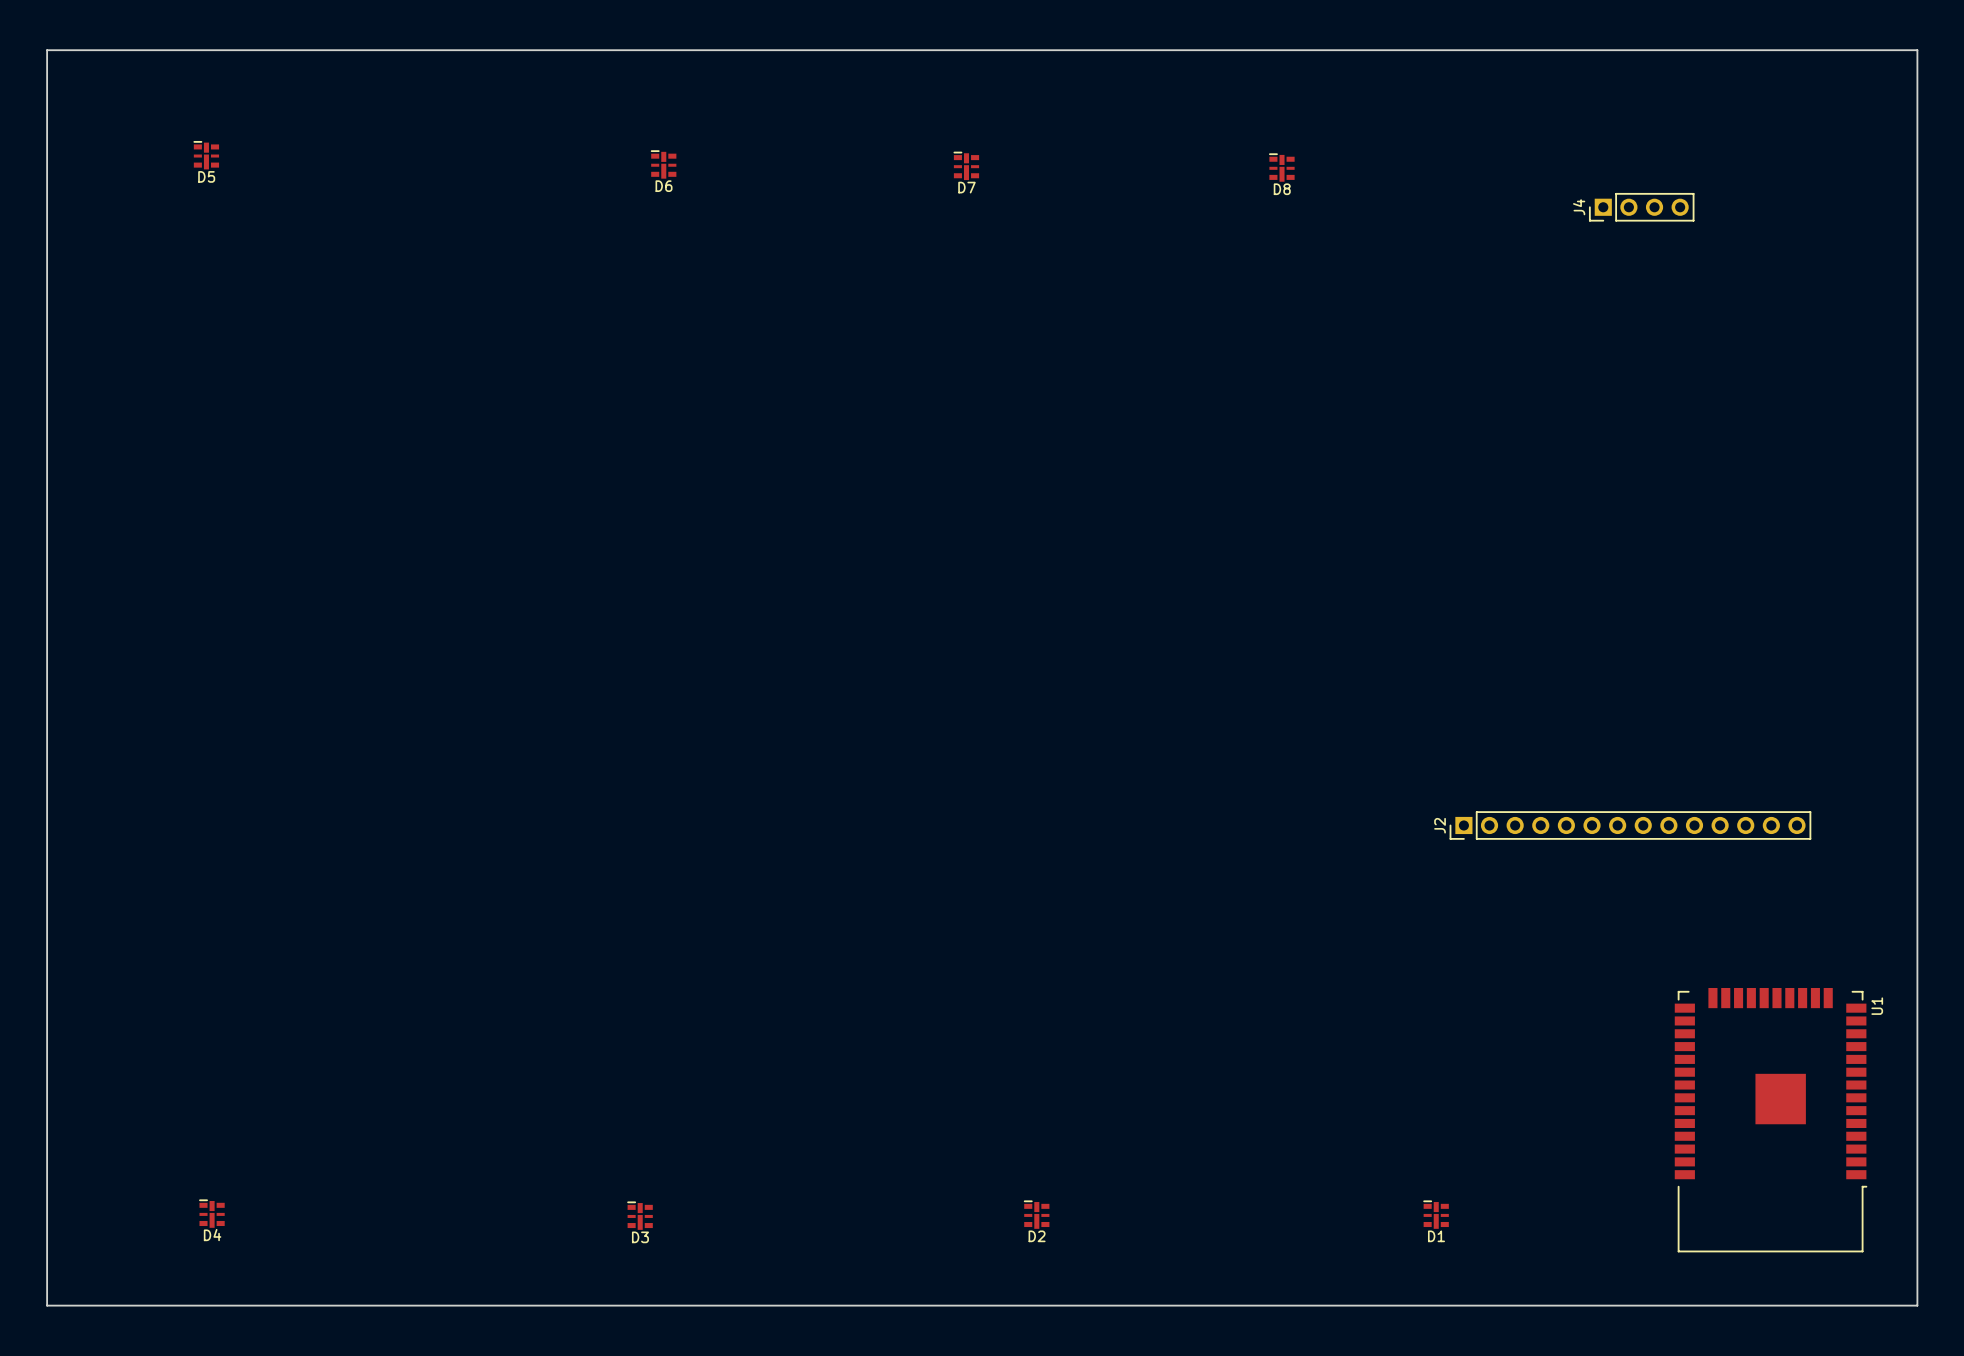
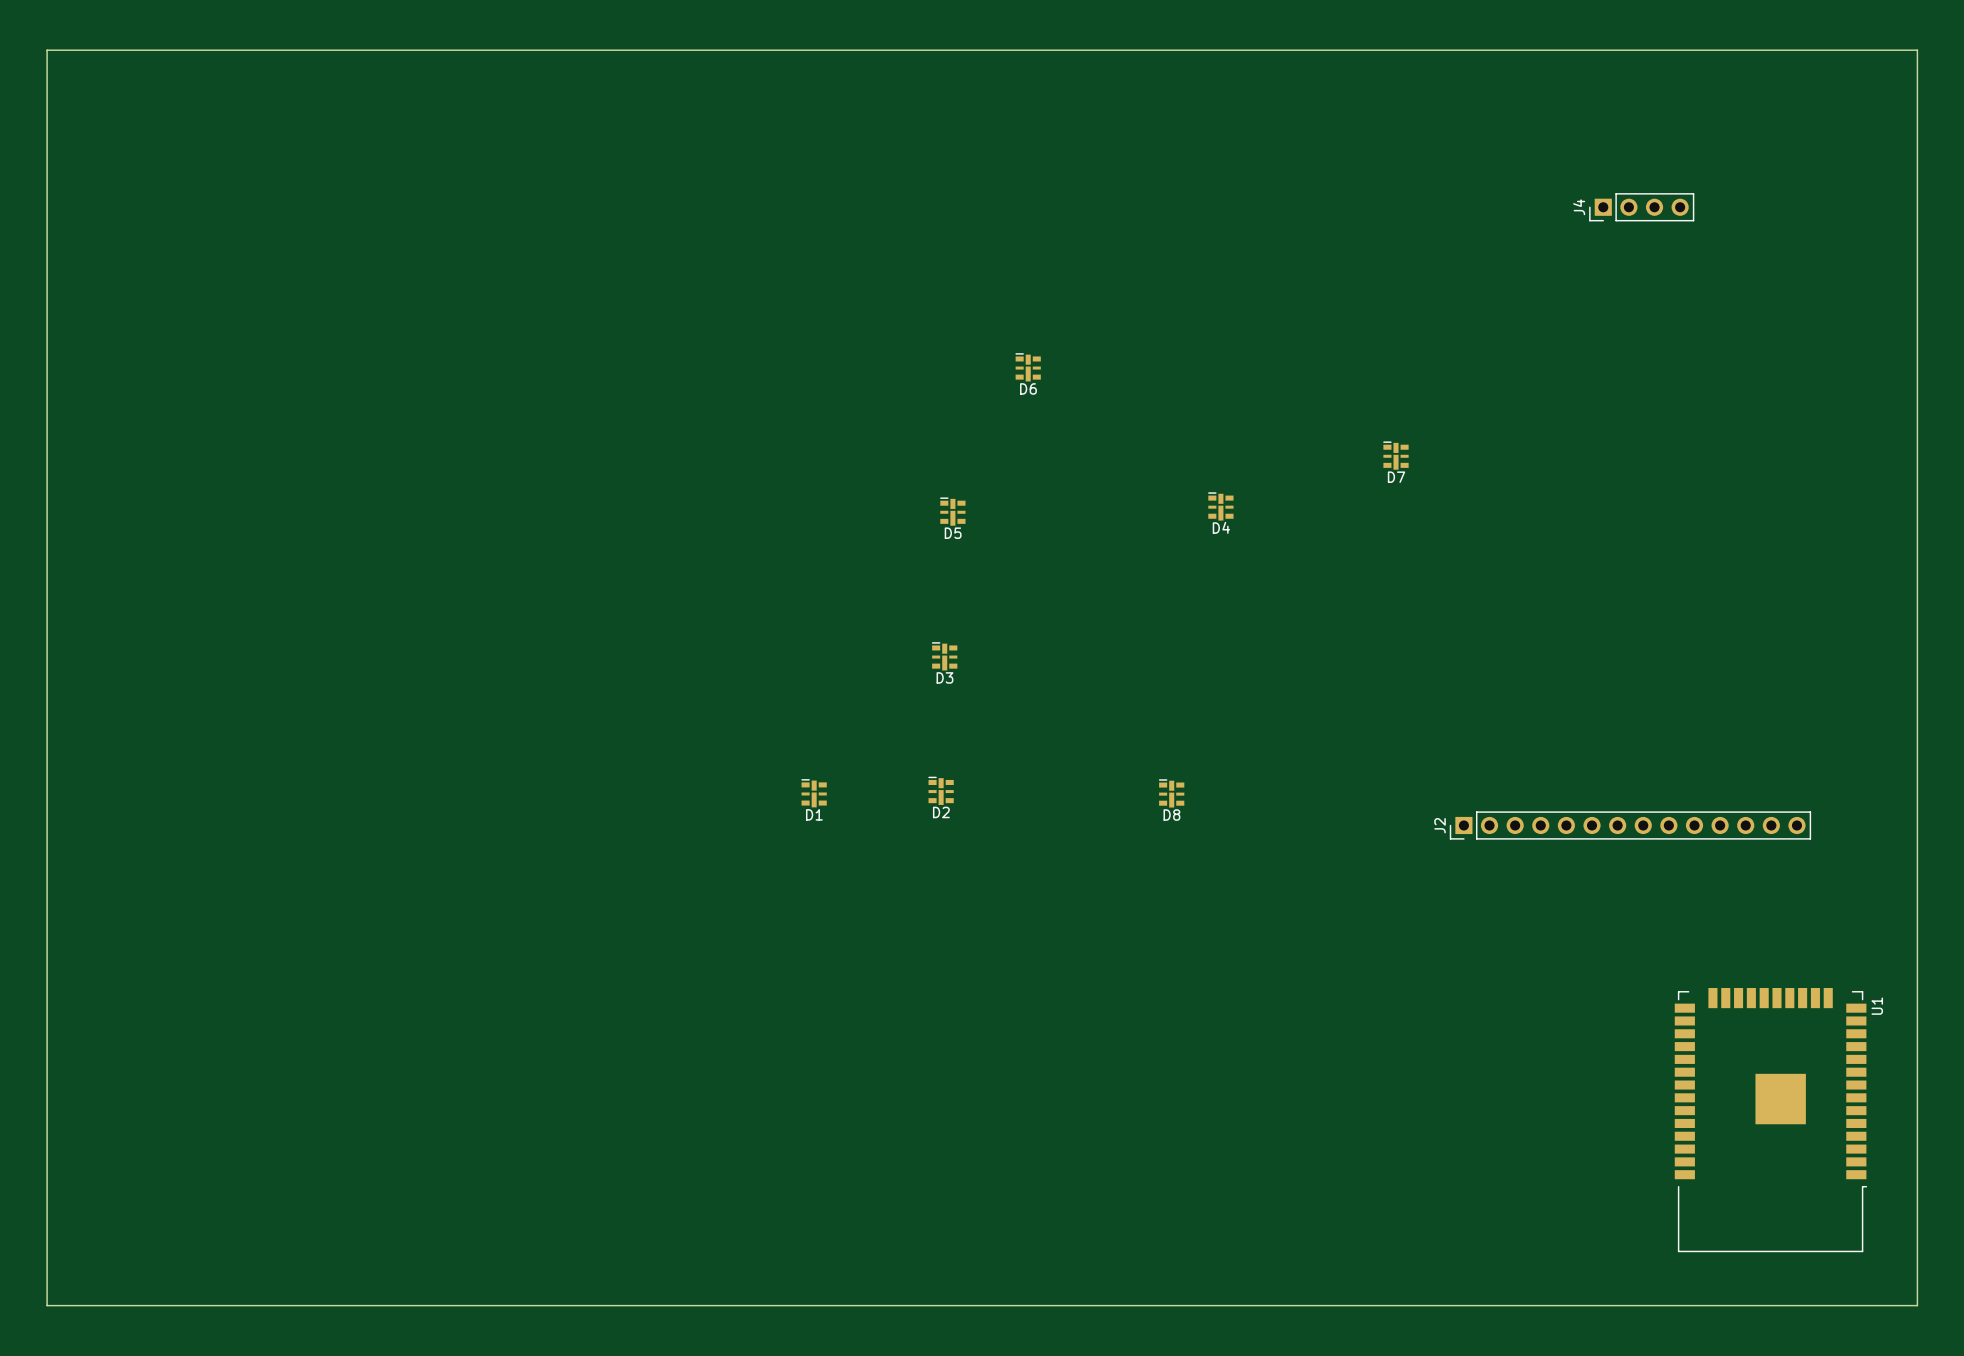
D5 position: (206, 155) -> (952, 511)
D6 position: (663, 164) -> (1028, 367)
D7 position: (966, 166) -> (1395, 455)
D8 position: (1281, 167) -> (1171, 793)
D4 position: (212, 1213) -> (1220, 506)
D2 position: (1036, 1214) -> (941, 790)
D1 position: (1436, 1214) -> (814, 793)
D3 position: (640, 1215) -> (944, 656)

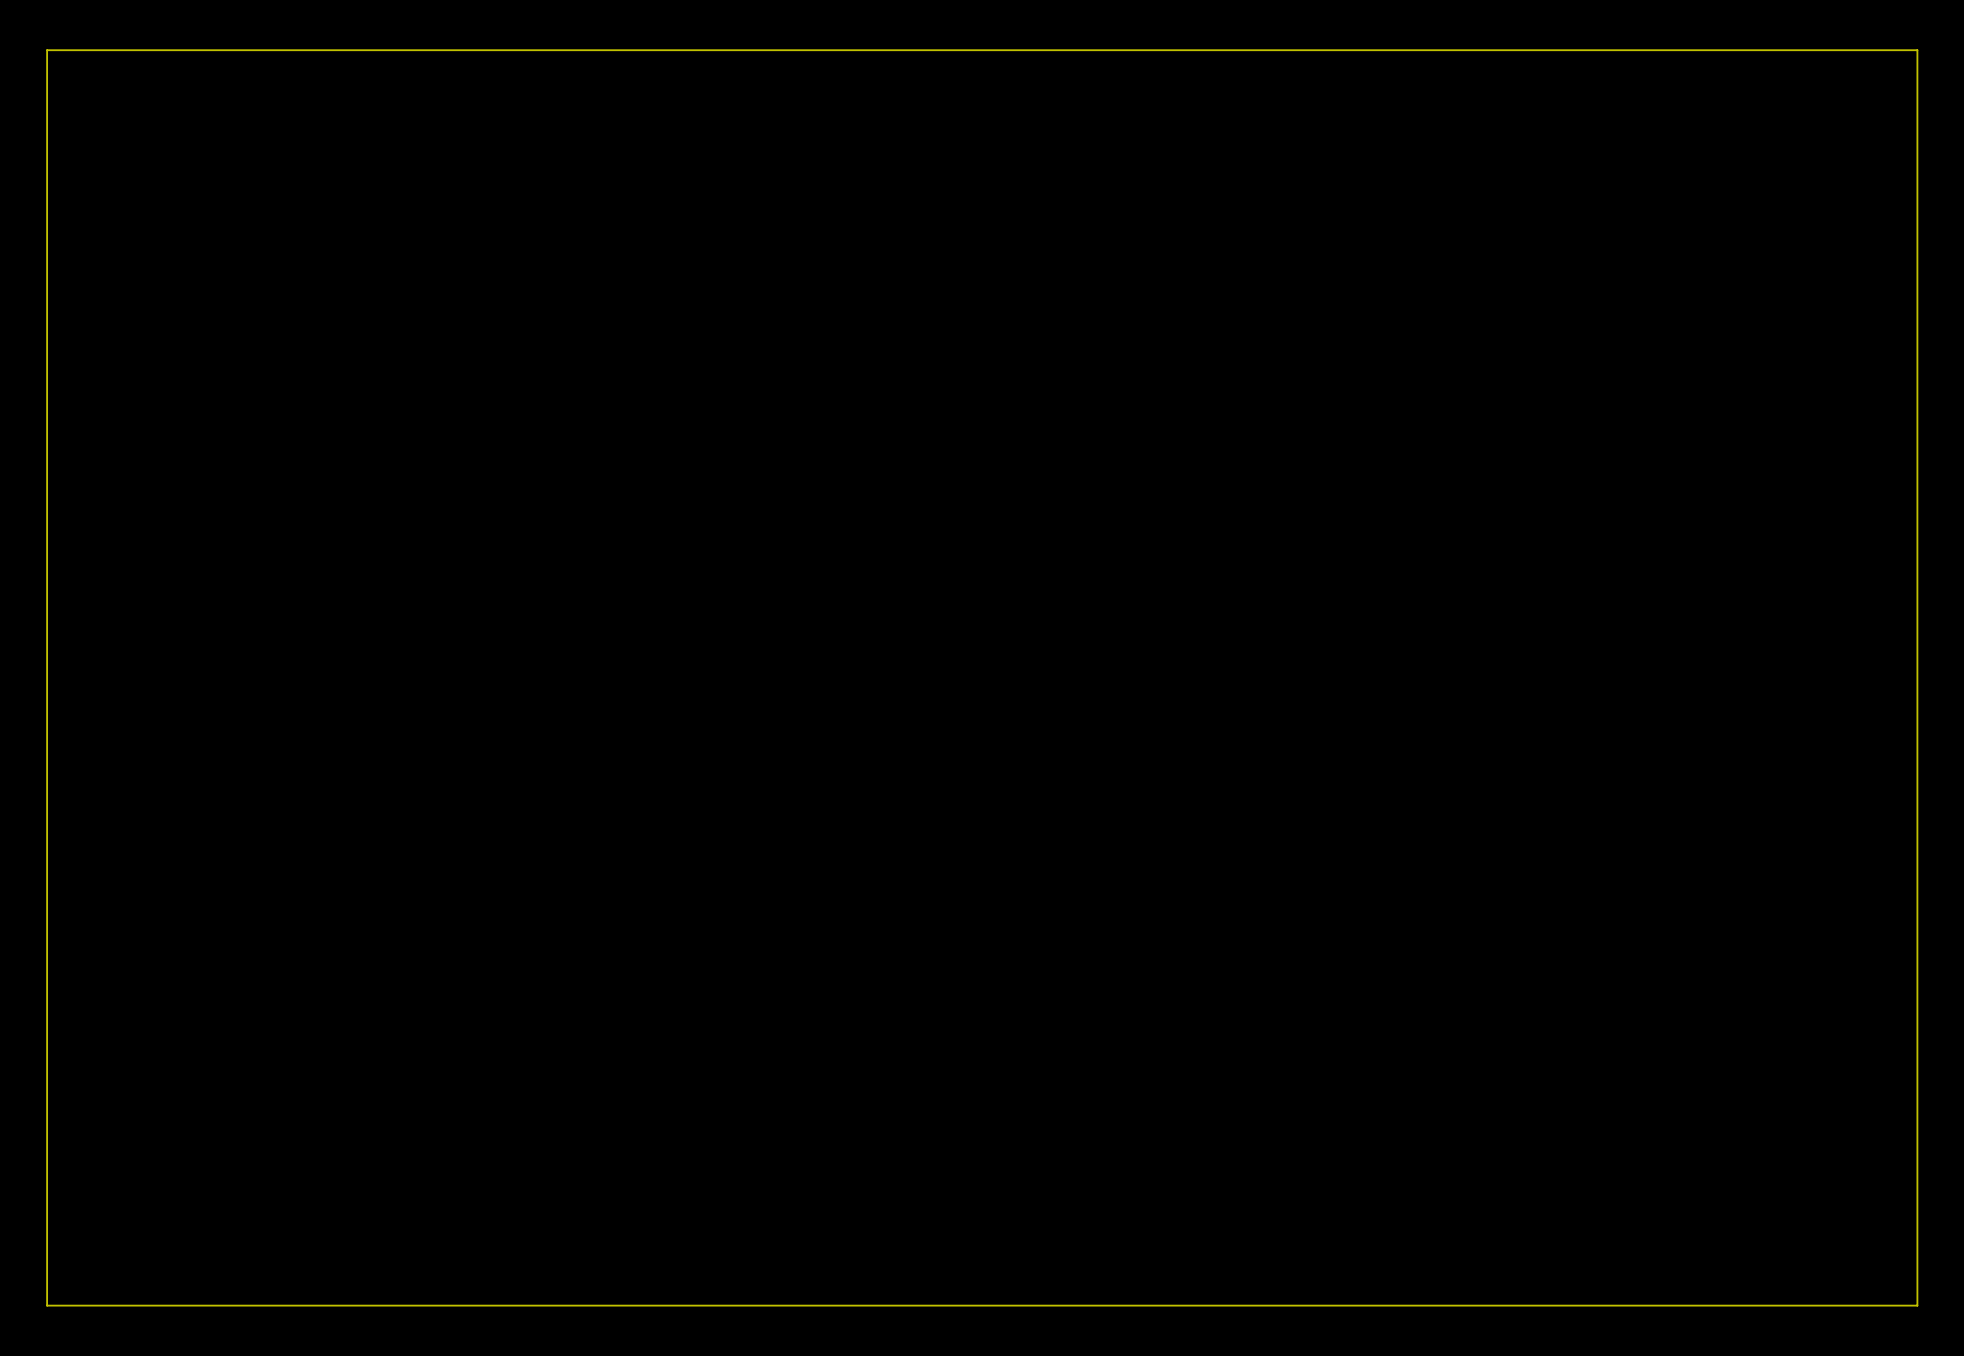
J4: (1641, 207) -> none
D6: (1028, 367) -> none
D7: (1395, 455) -> none
D4: (1220, 506) -> none
D5: (952, 511) -> none
D3: (944, 656) -> none
D2: (941, 790) -> none
D1: (814, 793) -> none
D8: (1171, 793) -> none
J2: (1630, 825) -> none
U1: (1770, 1120) -> none

